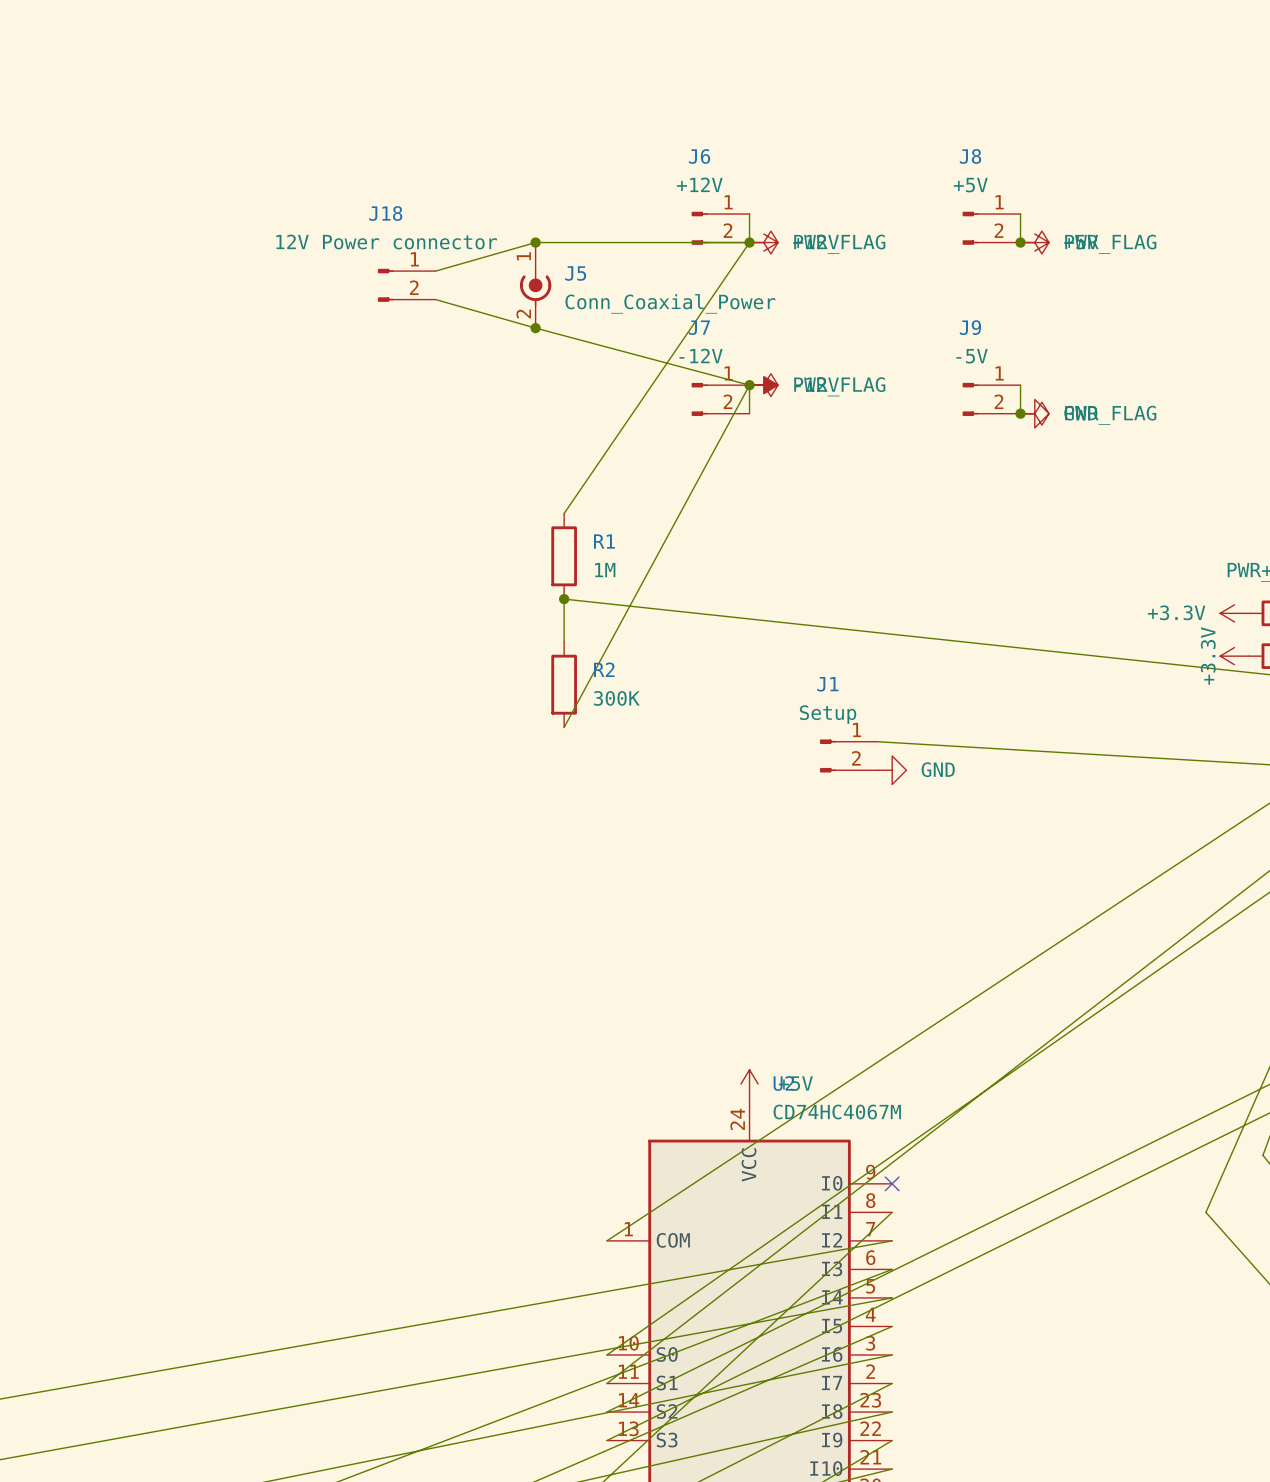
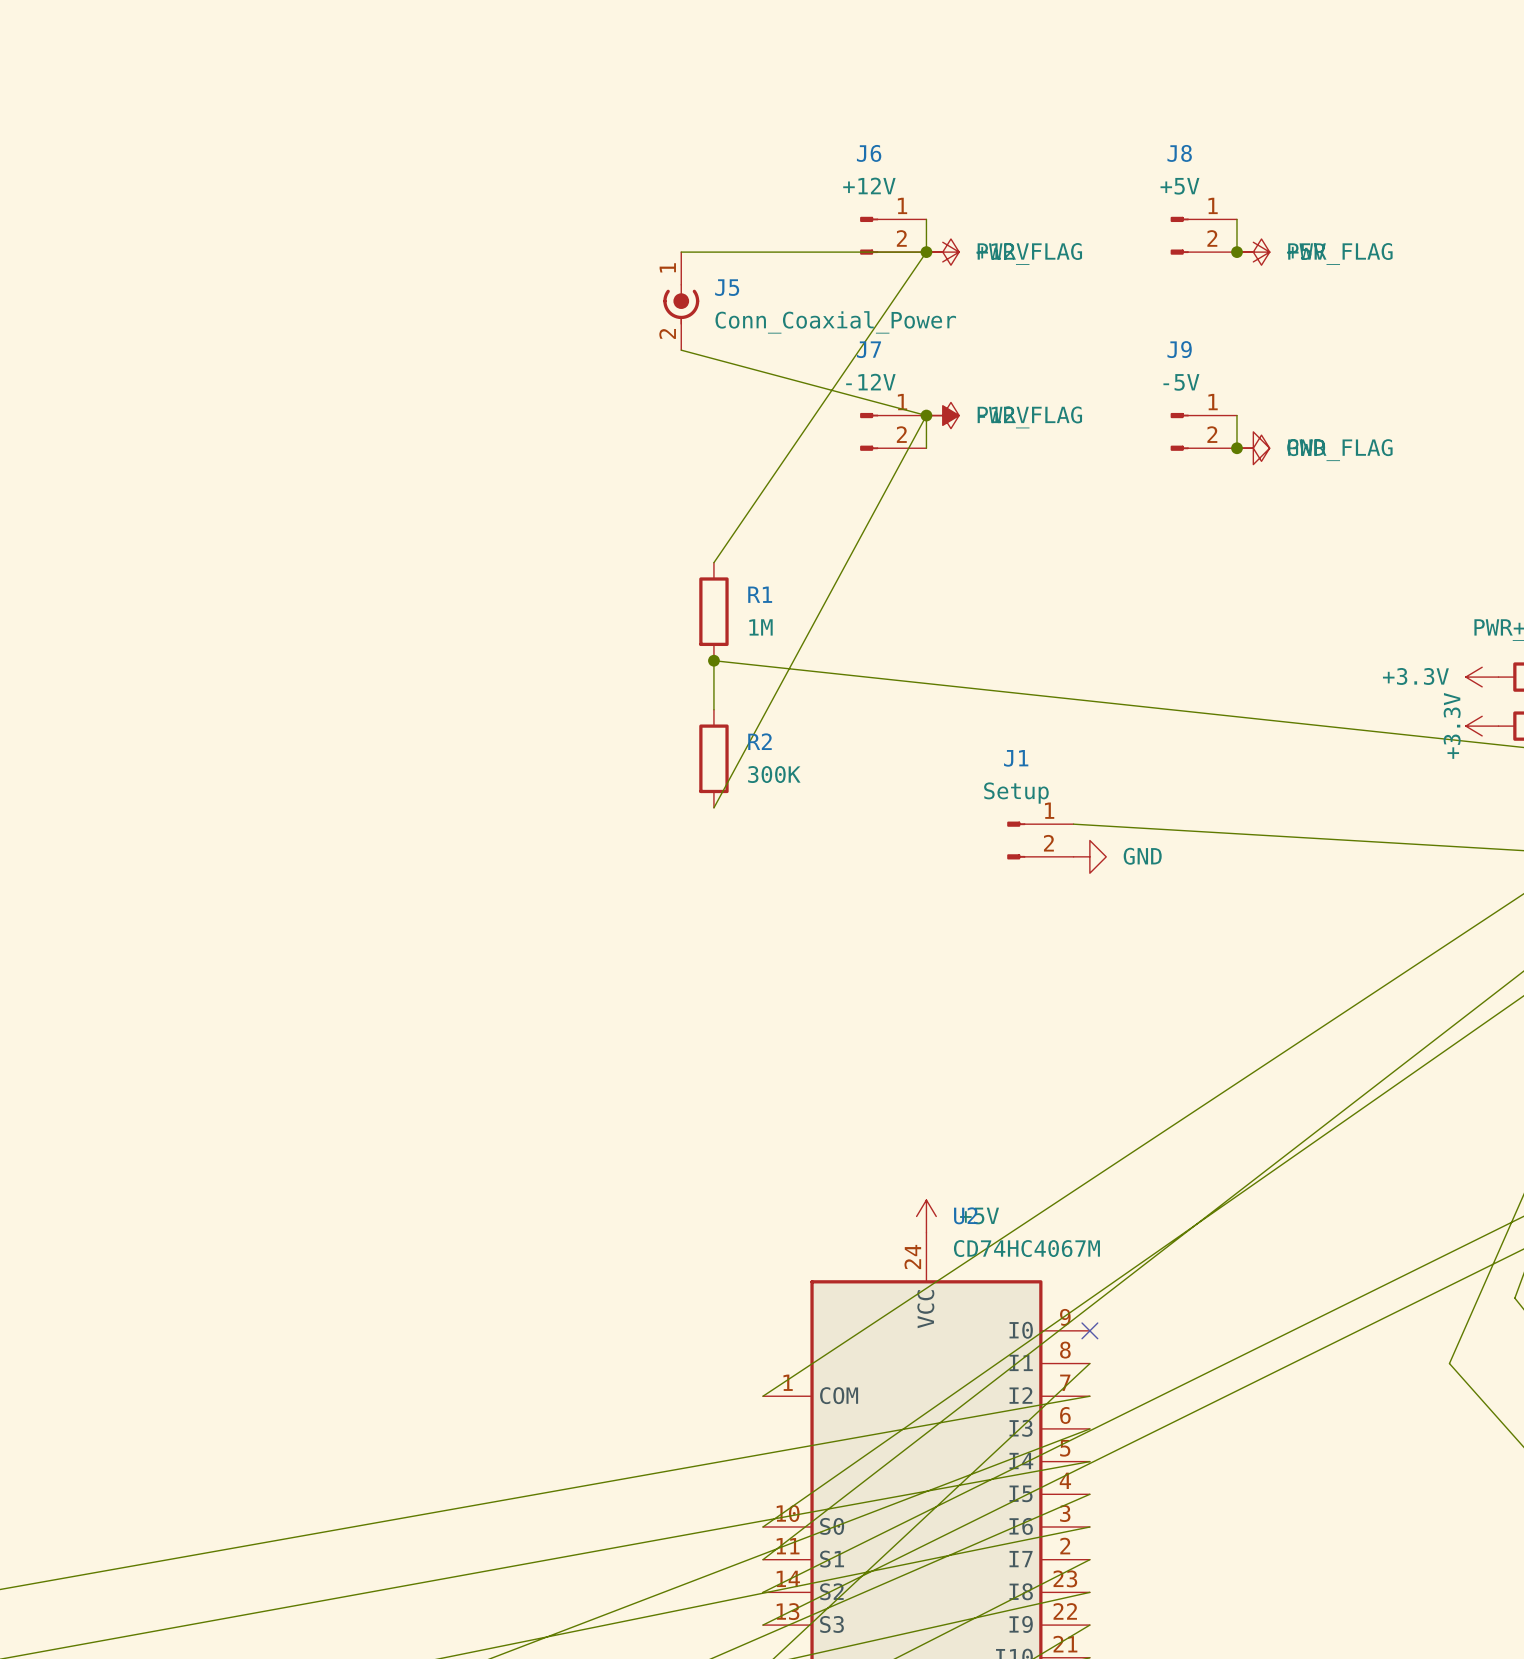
wire: (535, 242) (435, 271) -> none
junction: (535, 242) -> none
J18: 12V Power connector (406, 285) -> none
wire: (435, 299) (535, 328) -> none
junction: (535, 328) -> none

